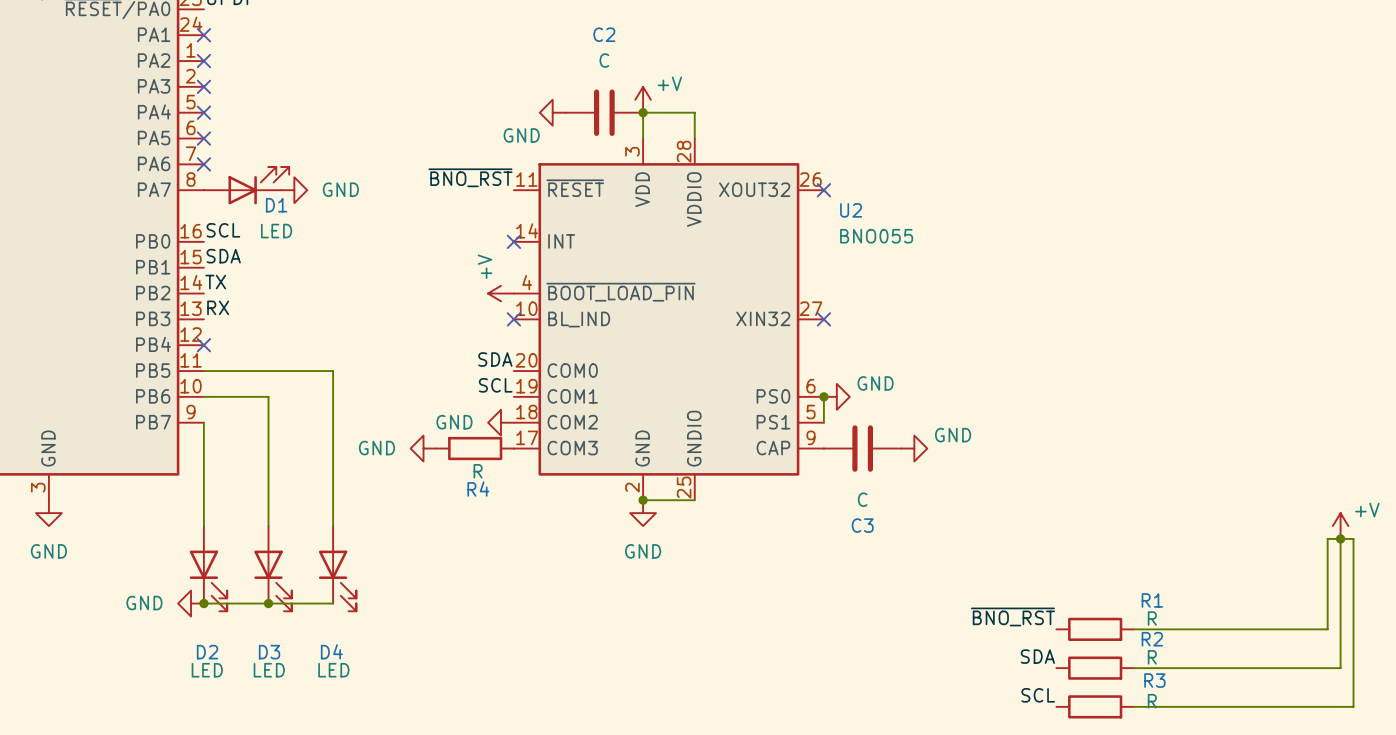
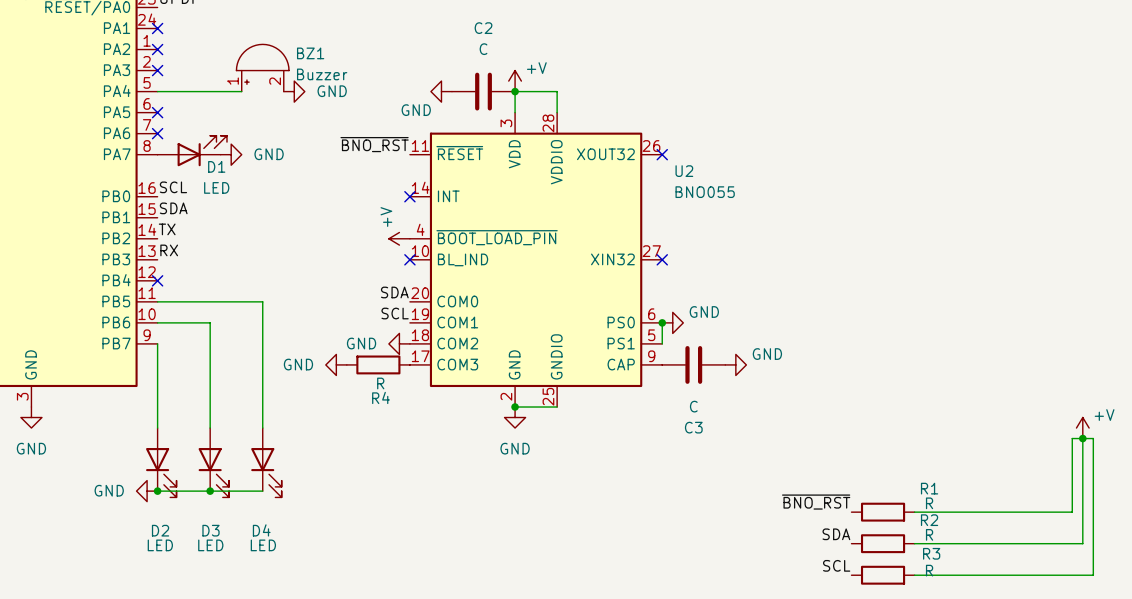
BZ1: none -> Buzzer (262, 67)
wire: none -> (157, 91) (241, 91)
no-connect mark: (203, 112) -> none
power symbol: none -> GND (294, 91)

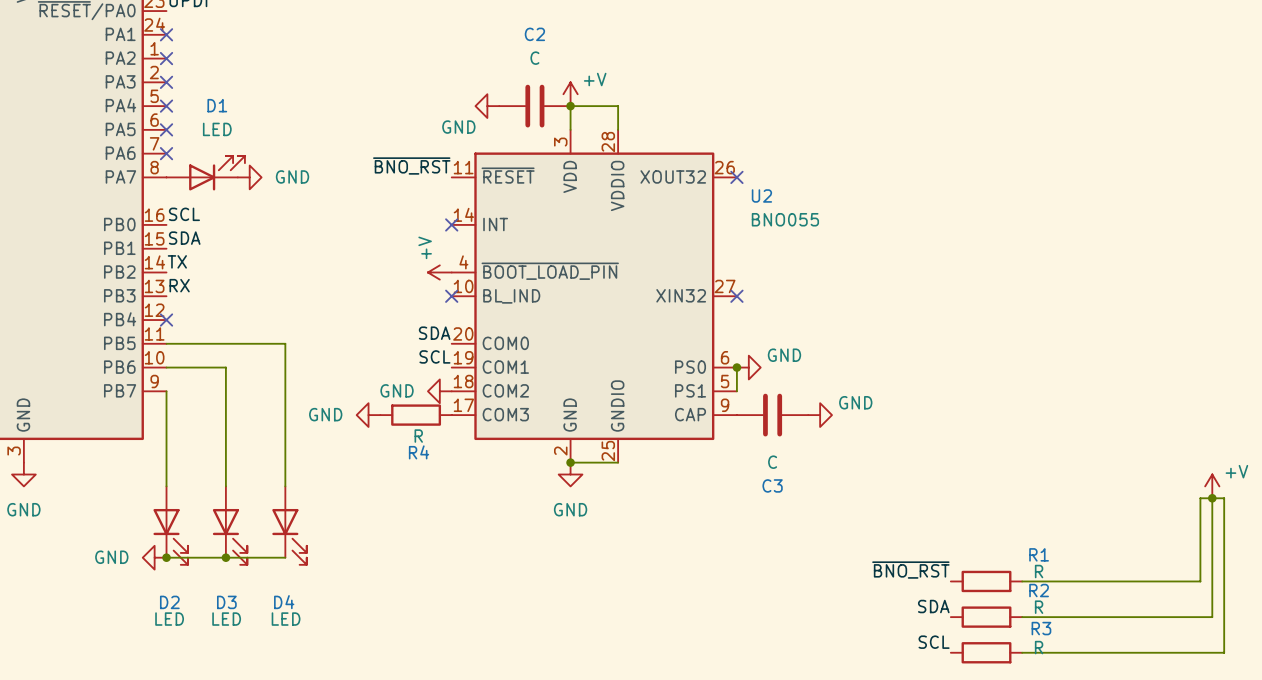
BZ1: Buzzer (262, 67) -> none
wire: (157, 91) (241, 91) -> none
no-connect mark: none -> (166, 106)
power symbol: GND (294, 91) -> none
D1 name position: D1 (216, 166) -> D1 (217, 105)
D1 value position: LED (216, 187) -> LED (217, 129)

